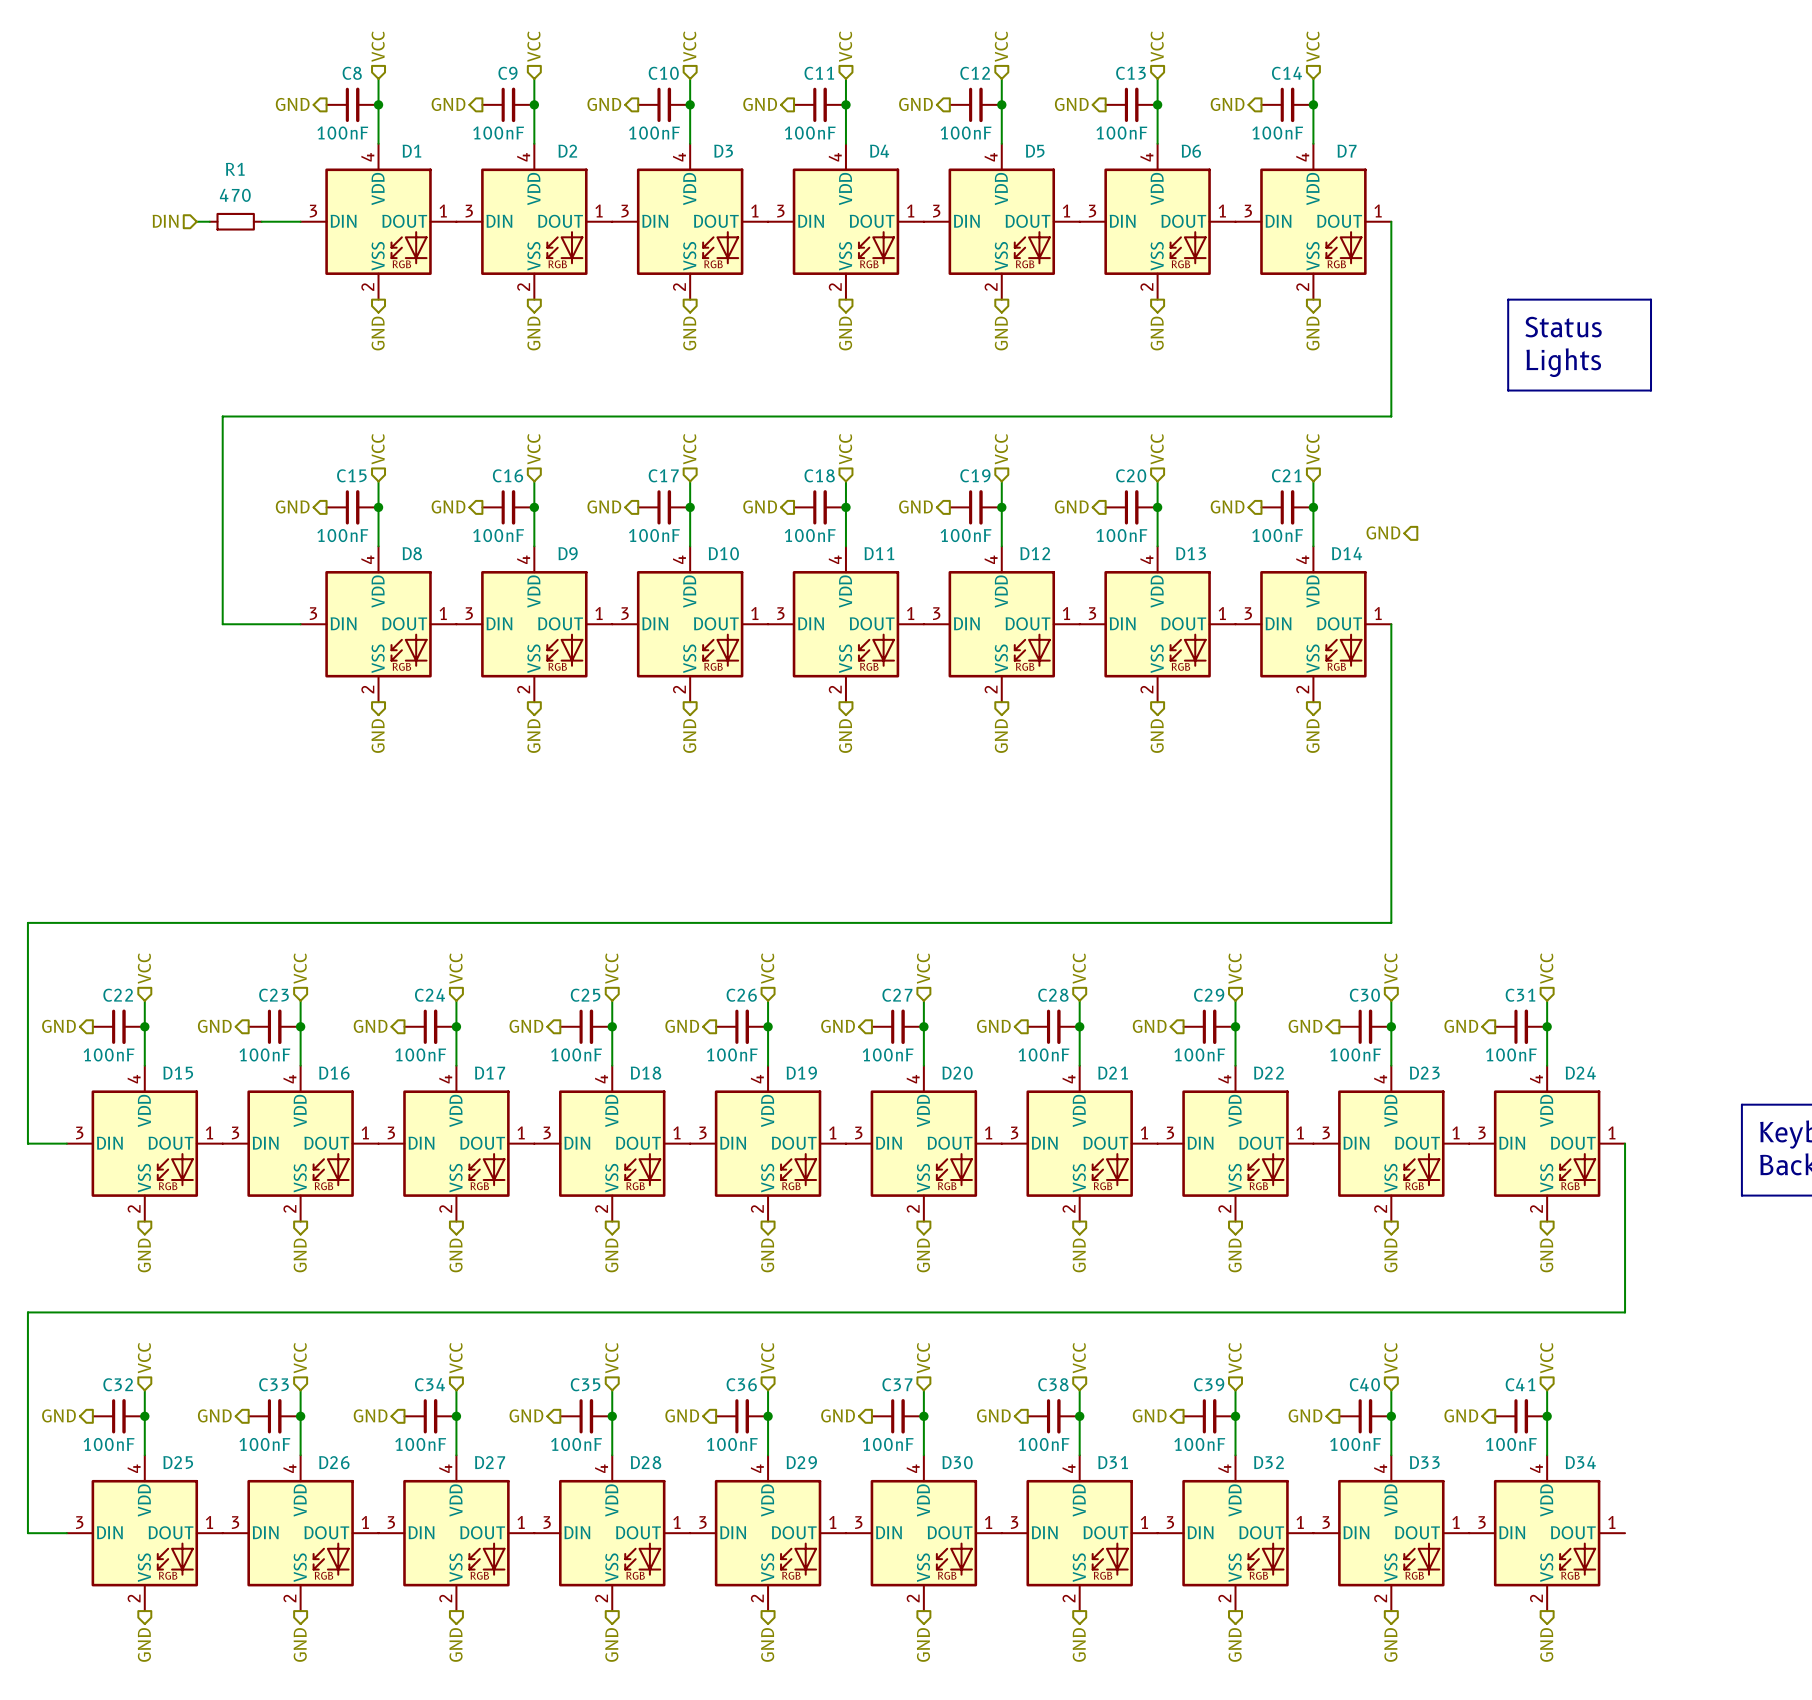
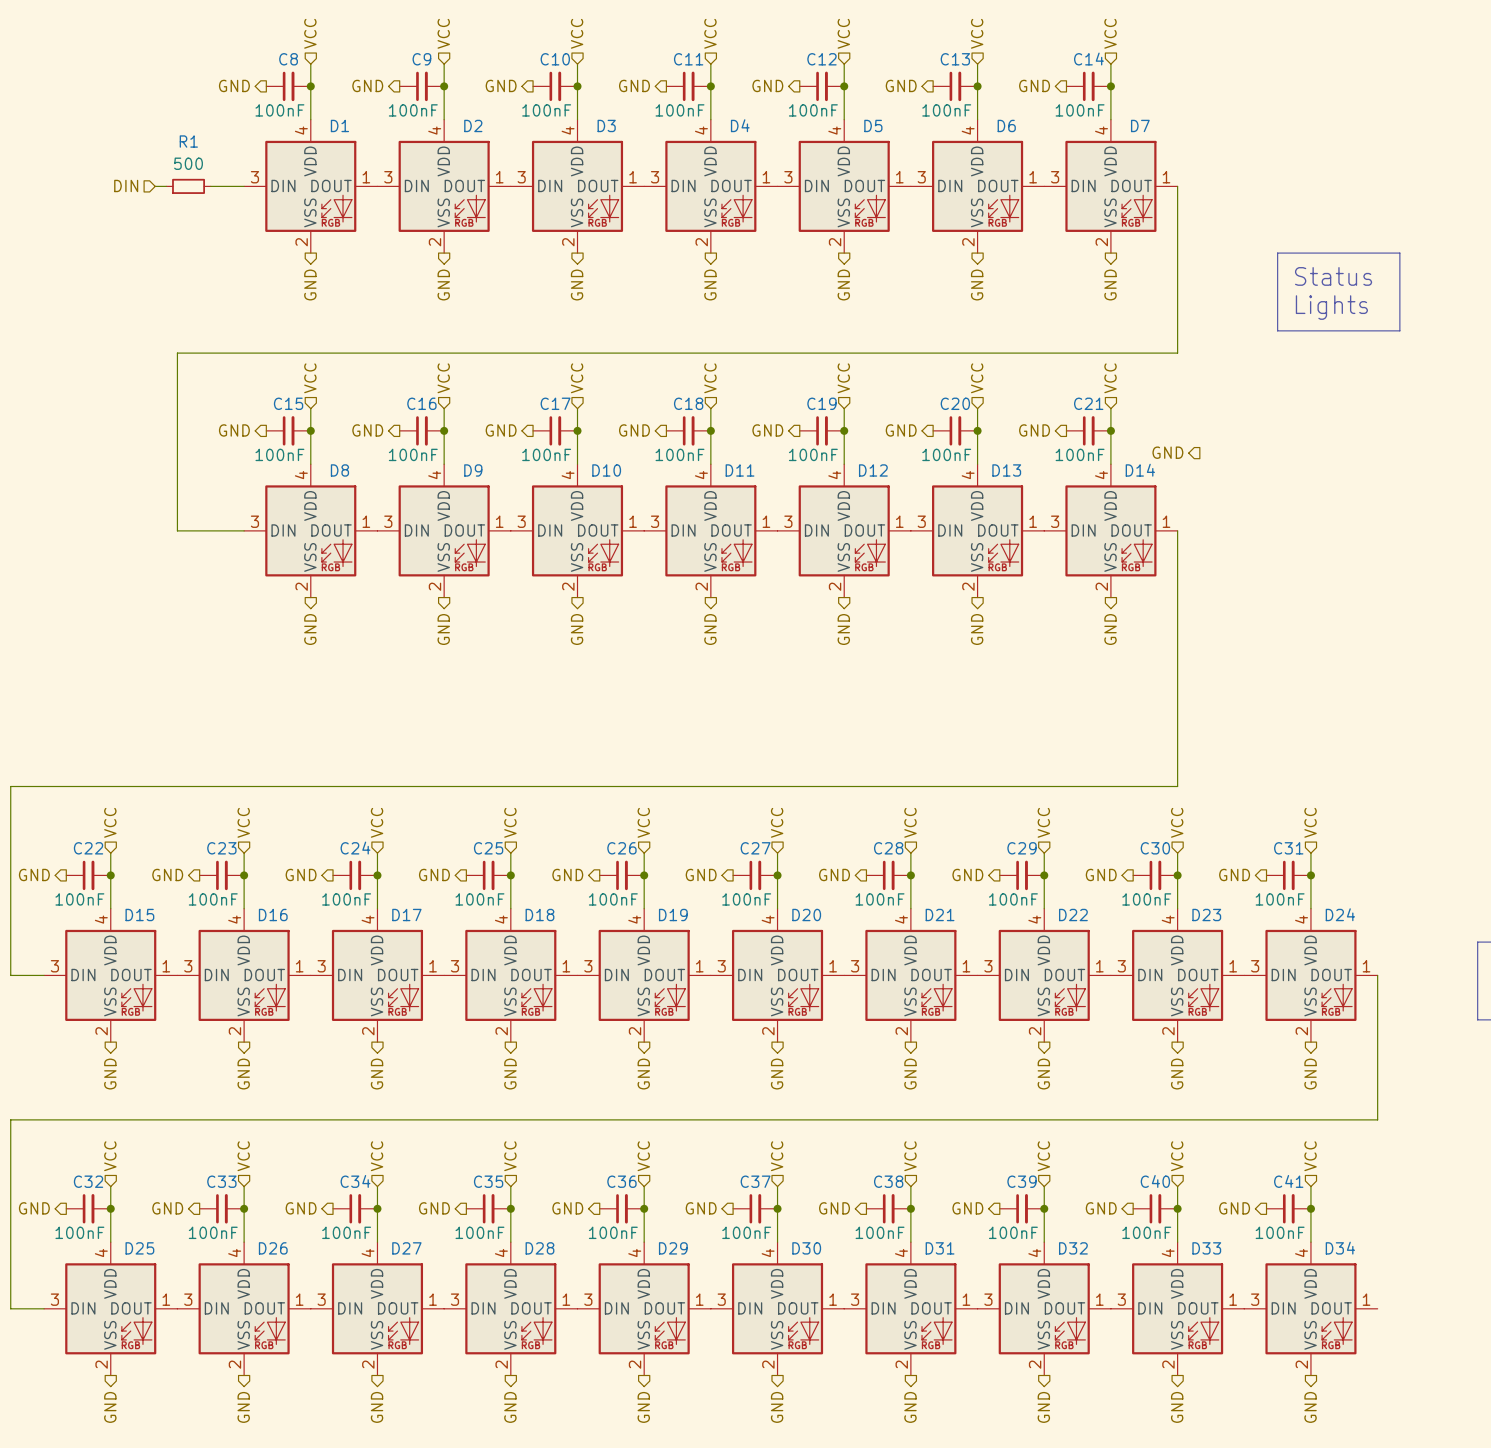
R1 value: 470 (235, 195) -> 500 (188, 163)

